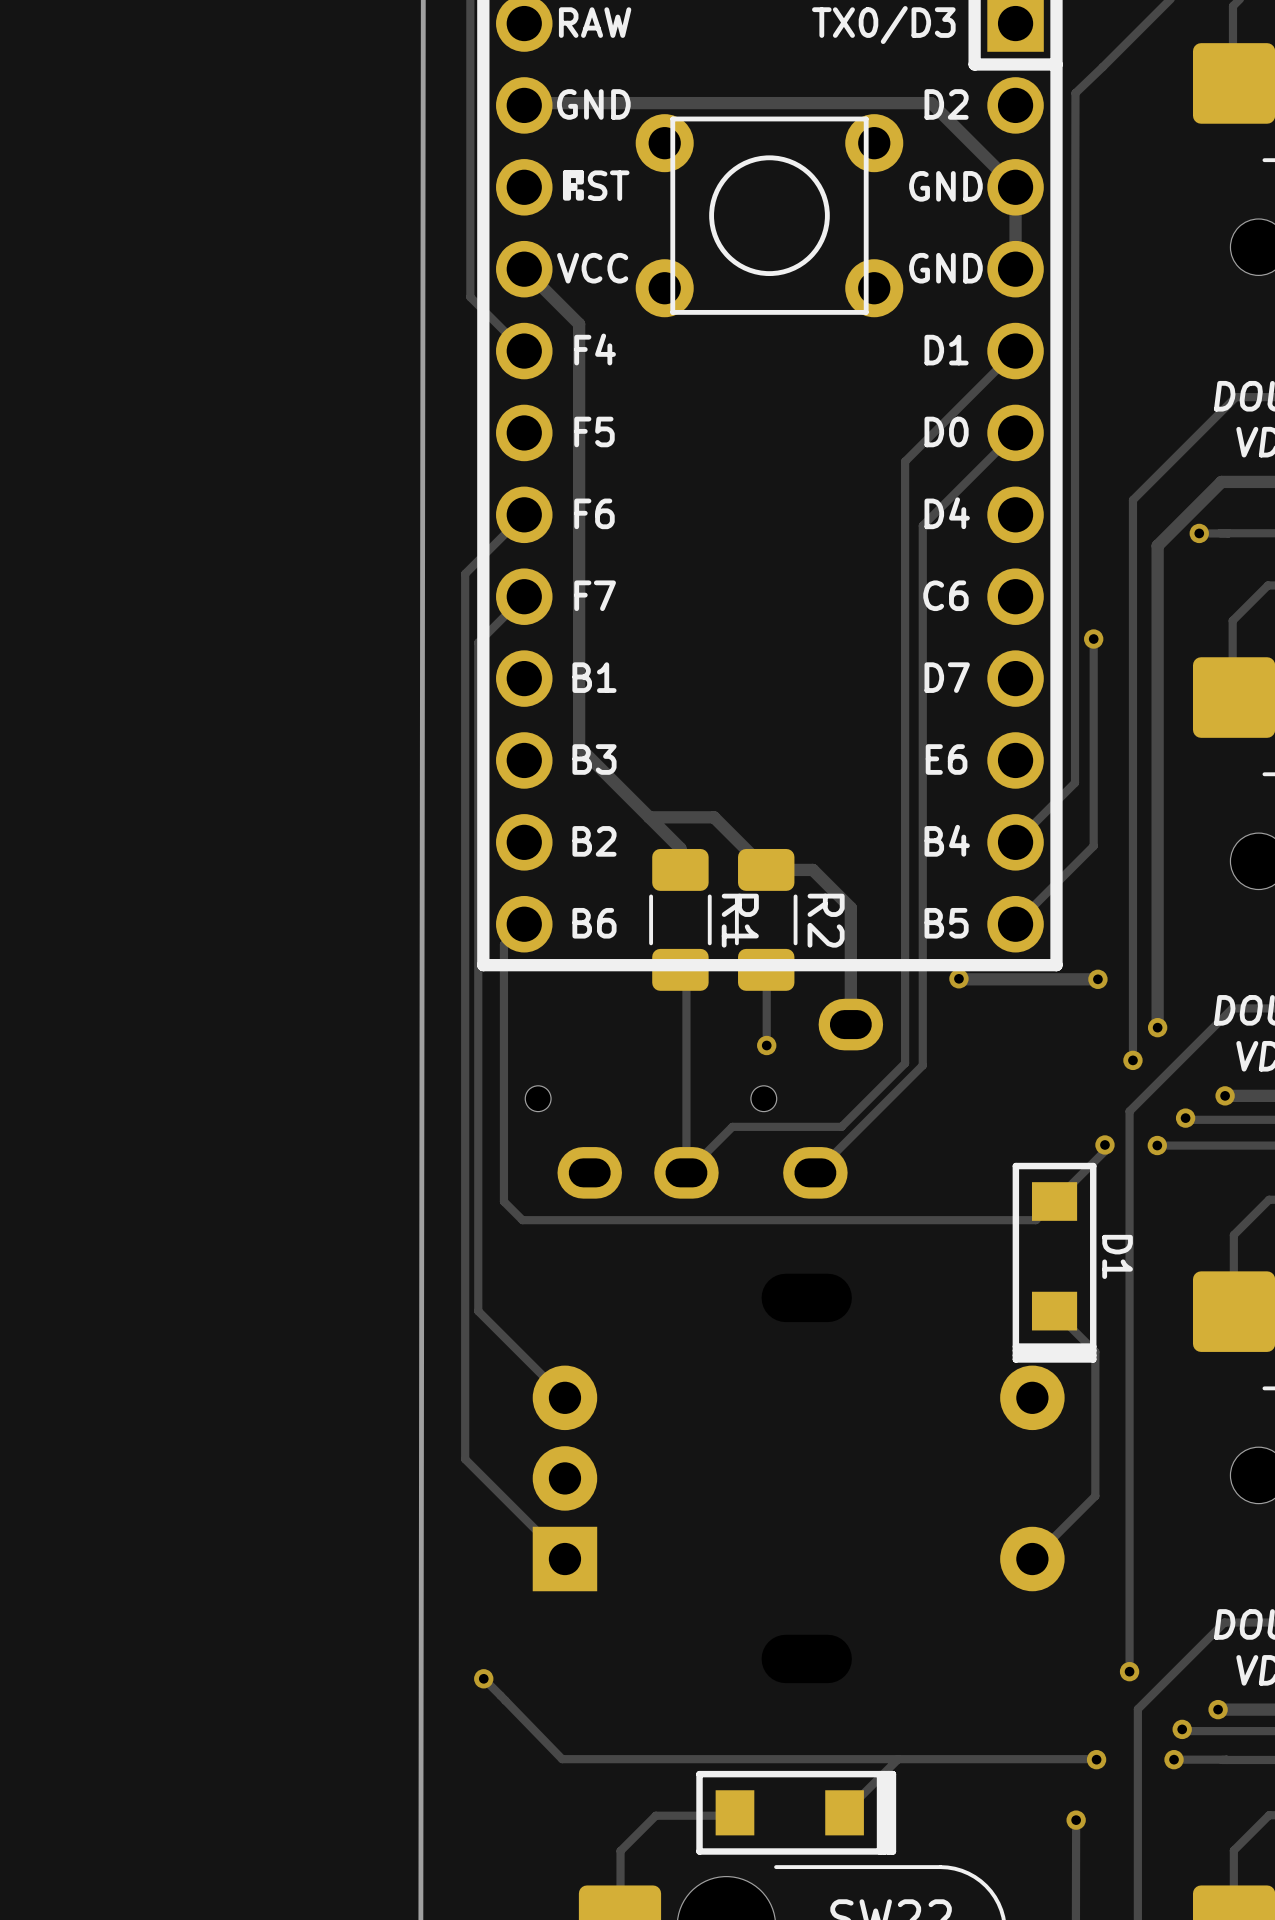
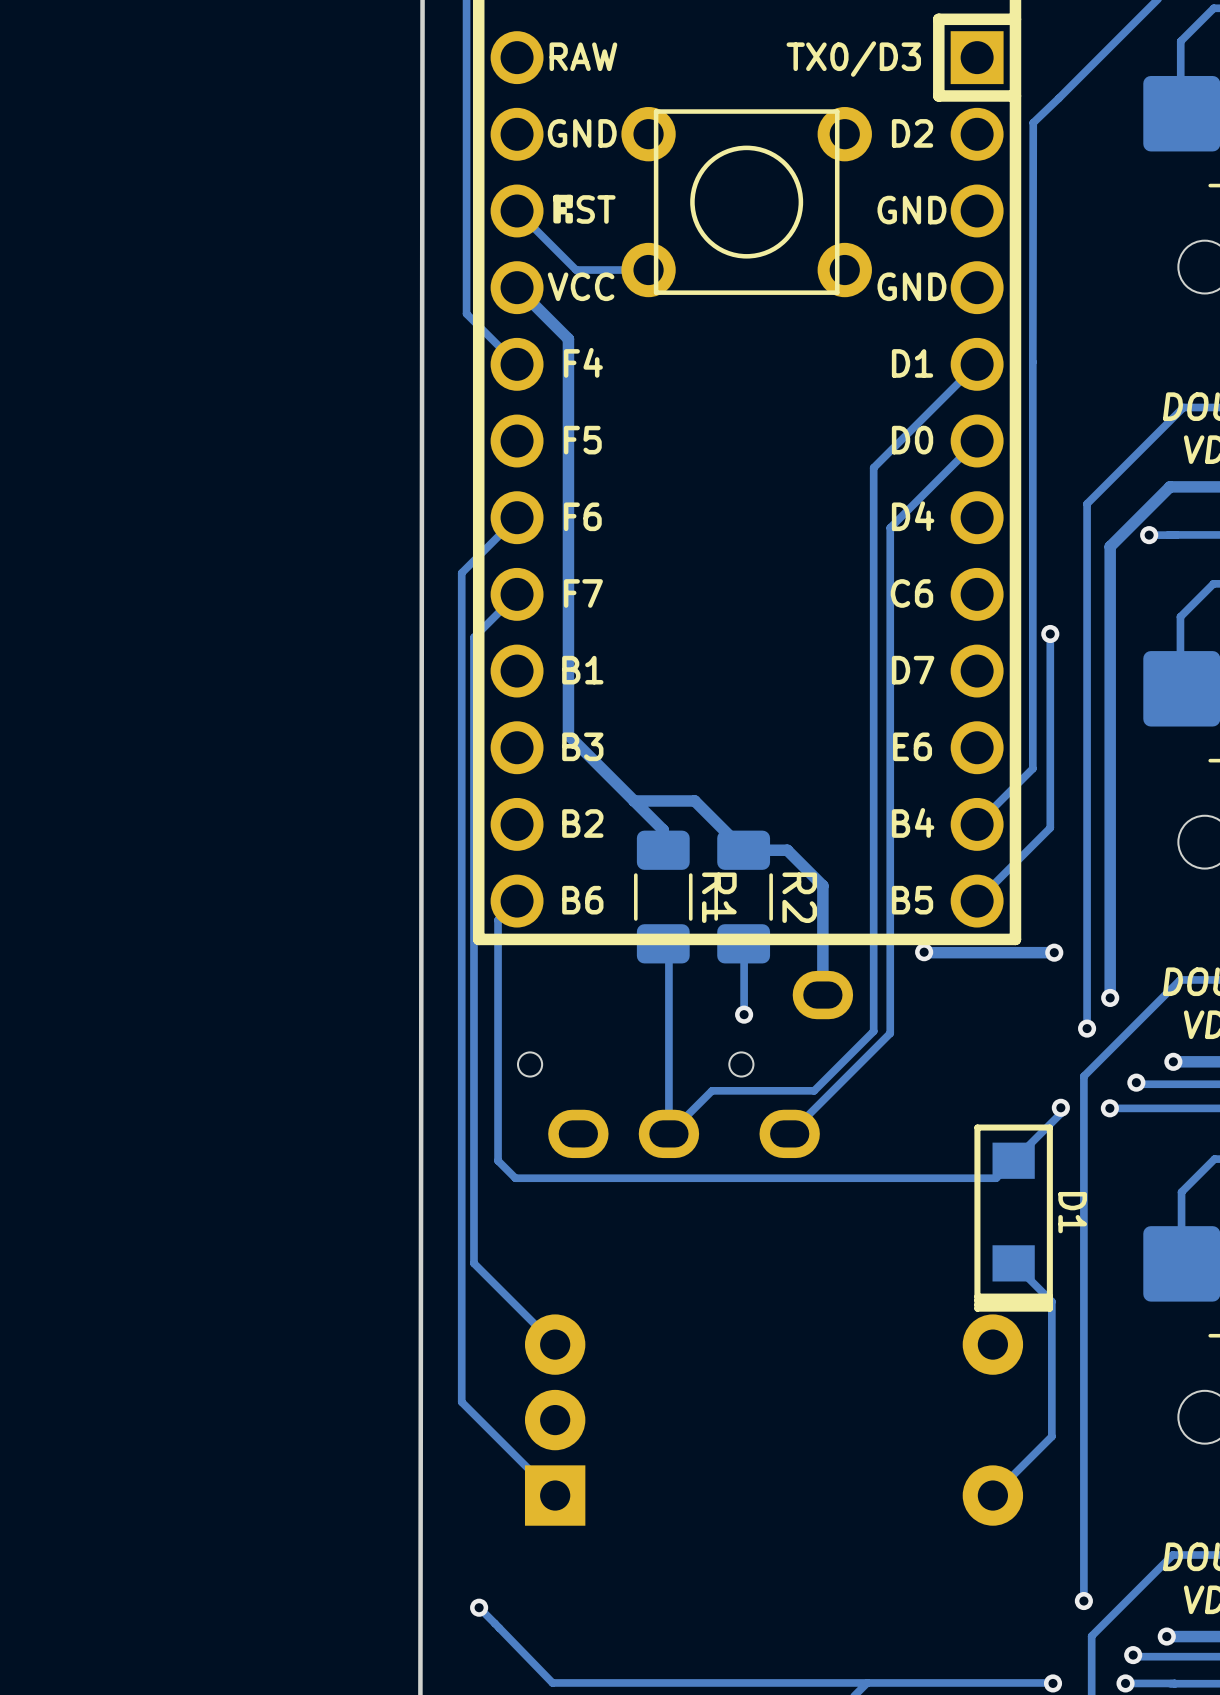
track: (526, 103) (931, 103) (1015, 187) (1015, 269) -> none
track: none -> (517, 210) (576, 270) (648, 270)
part position: (769, 215) -> (746, 202)

